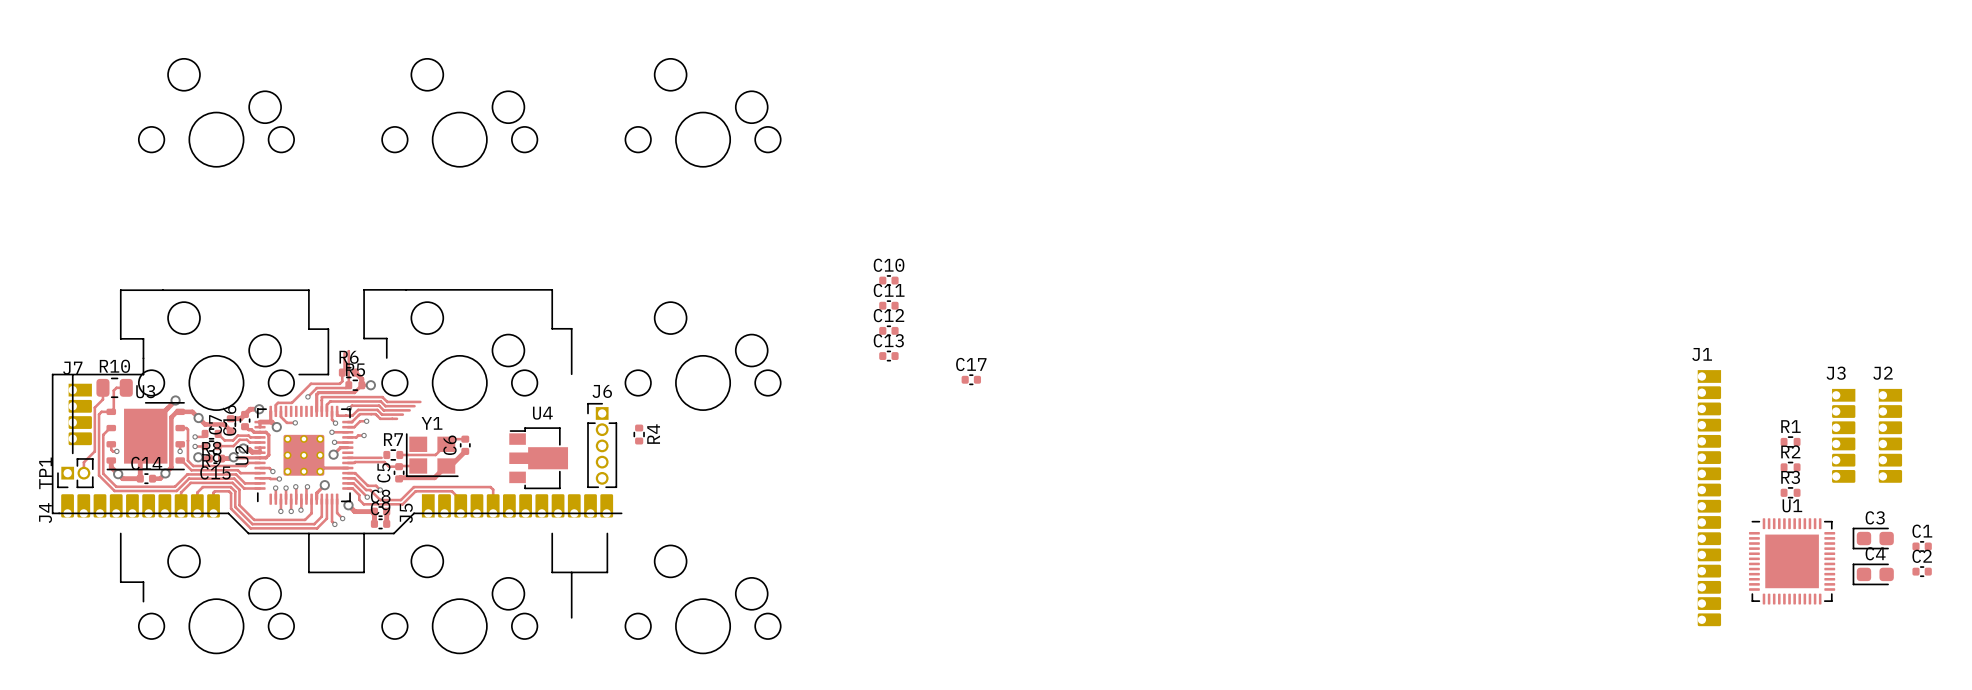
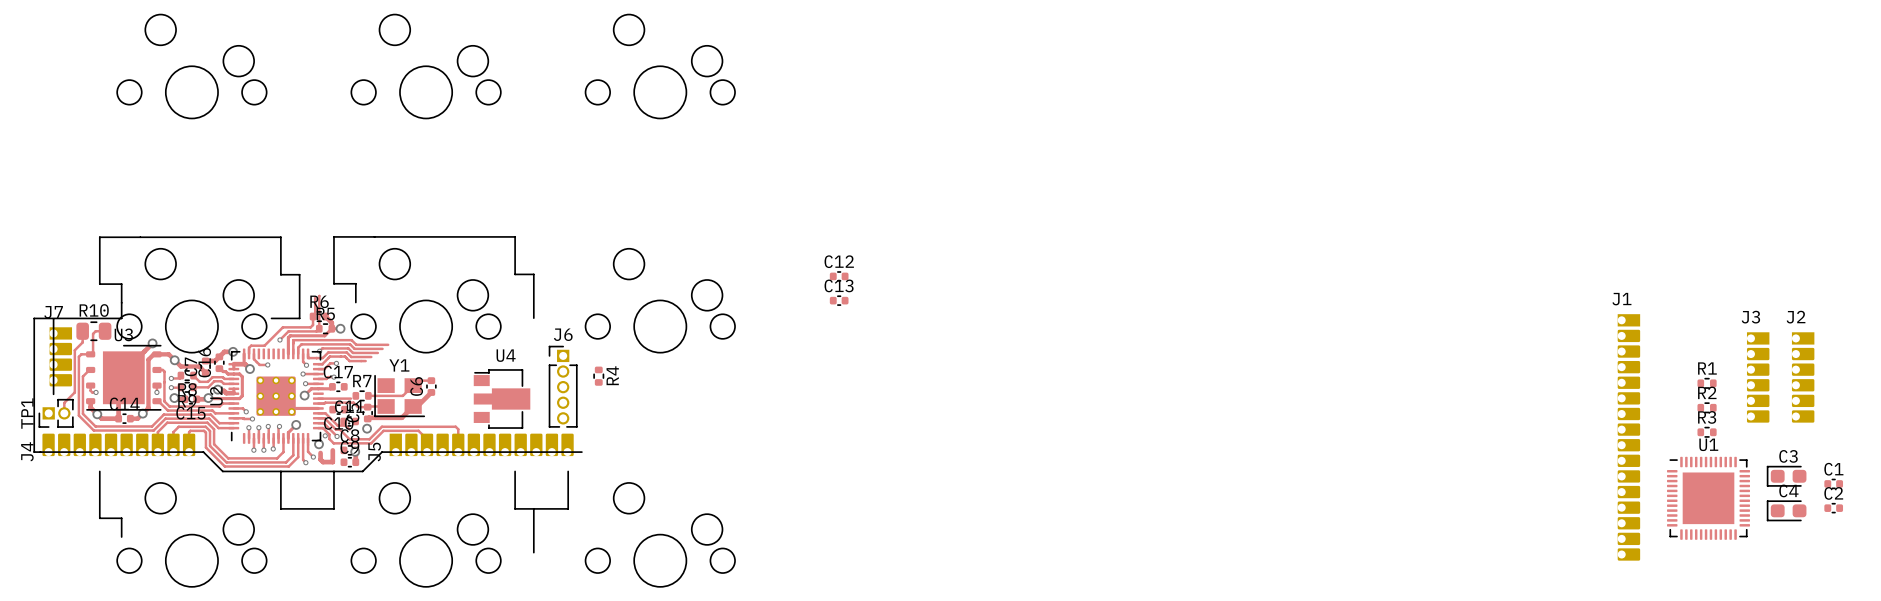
C10 name position: C10 (889, 265) -> C10 (338, 423)
C10 position: (888, 280) -> (338, 409)
C11 position: (888, 305) -> (349, 421)
C17 position: (971, 379) -> (338, 386)
track: none -> (332, 386) (330, 388) (318, 388)
via: none -> (367, 428)
via position: (380, 490) -> (325, 435)
track: (348, 505) (354, 511) (374, 511) (374, 523) -> none
track: none -> (332, 450) (332, 462) (323, 462) (320, 459) (320, 453)
via: none -> (355, 451)

